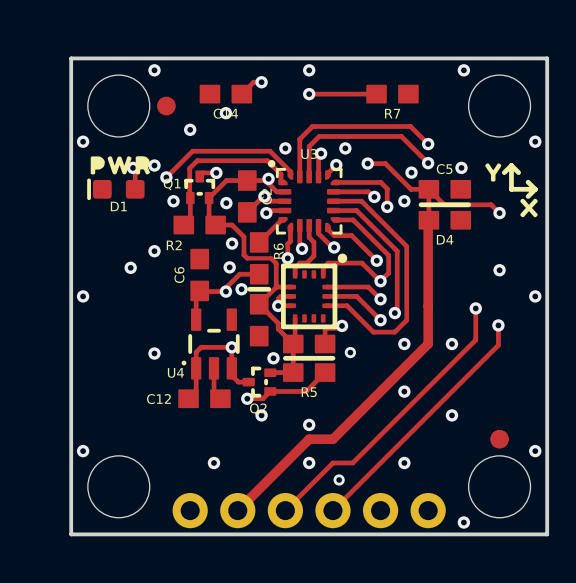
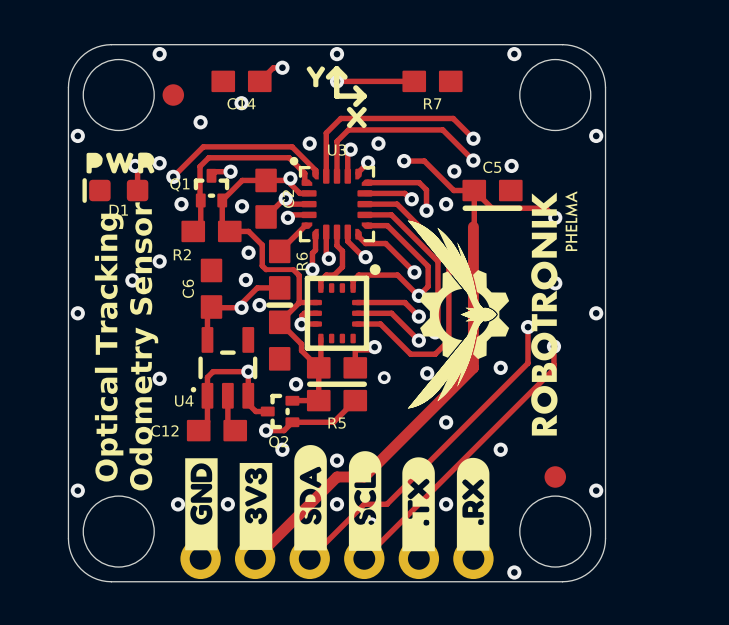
board edge: (71, 58) (547, 58) (547, 534) (71, 534) (71, 58) -> (111, 44) (97, 47) (81, 57) (72, 68) (68, 82) (68, 538) (70, 552) (81, 569) (97, 579) (111, 581) (562, 581) (581, 577) (592, 569) (601, 557) (605, 538) (605, 87) (601, 68) (592, 57) (576, 47) (562, 44) (111, 44)
line: (511, 165) (518, 172) -> (336, 68) (344, 77)
line: (511, 165) (504, 172) -> (336, 68) (328, 77)
line: (511, 165) (511, 189) (535, 189) -> (336, 68) (336, 96) (364, 96)
drawing position: (493, 172) -> (315, 76)
line: (528, 182) (535, 189) -> (355, 87) (364, 96)
line: (535, 189) (528, 196) -> (364, 96) (355, 104)
drawing: none -> [407, 191, 578, 436]
drawing position: (529, 207) -> (356, 117)
D4: (444, 220) -> none
text: none -> Odometry Sensor (143, 346)
text: none -> Optical Tracking (109, 347)
via position: (404, 344) -> (427, 373)
drawing: none -> [185, 445, 490, 552]
via: none -> (178, 504)

